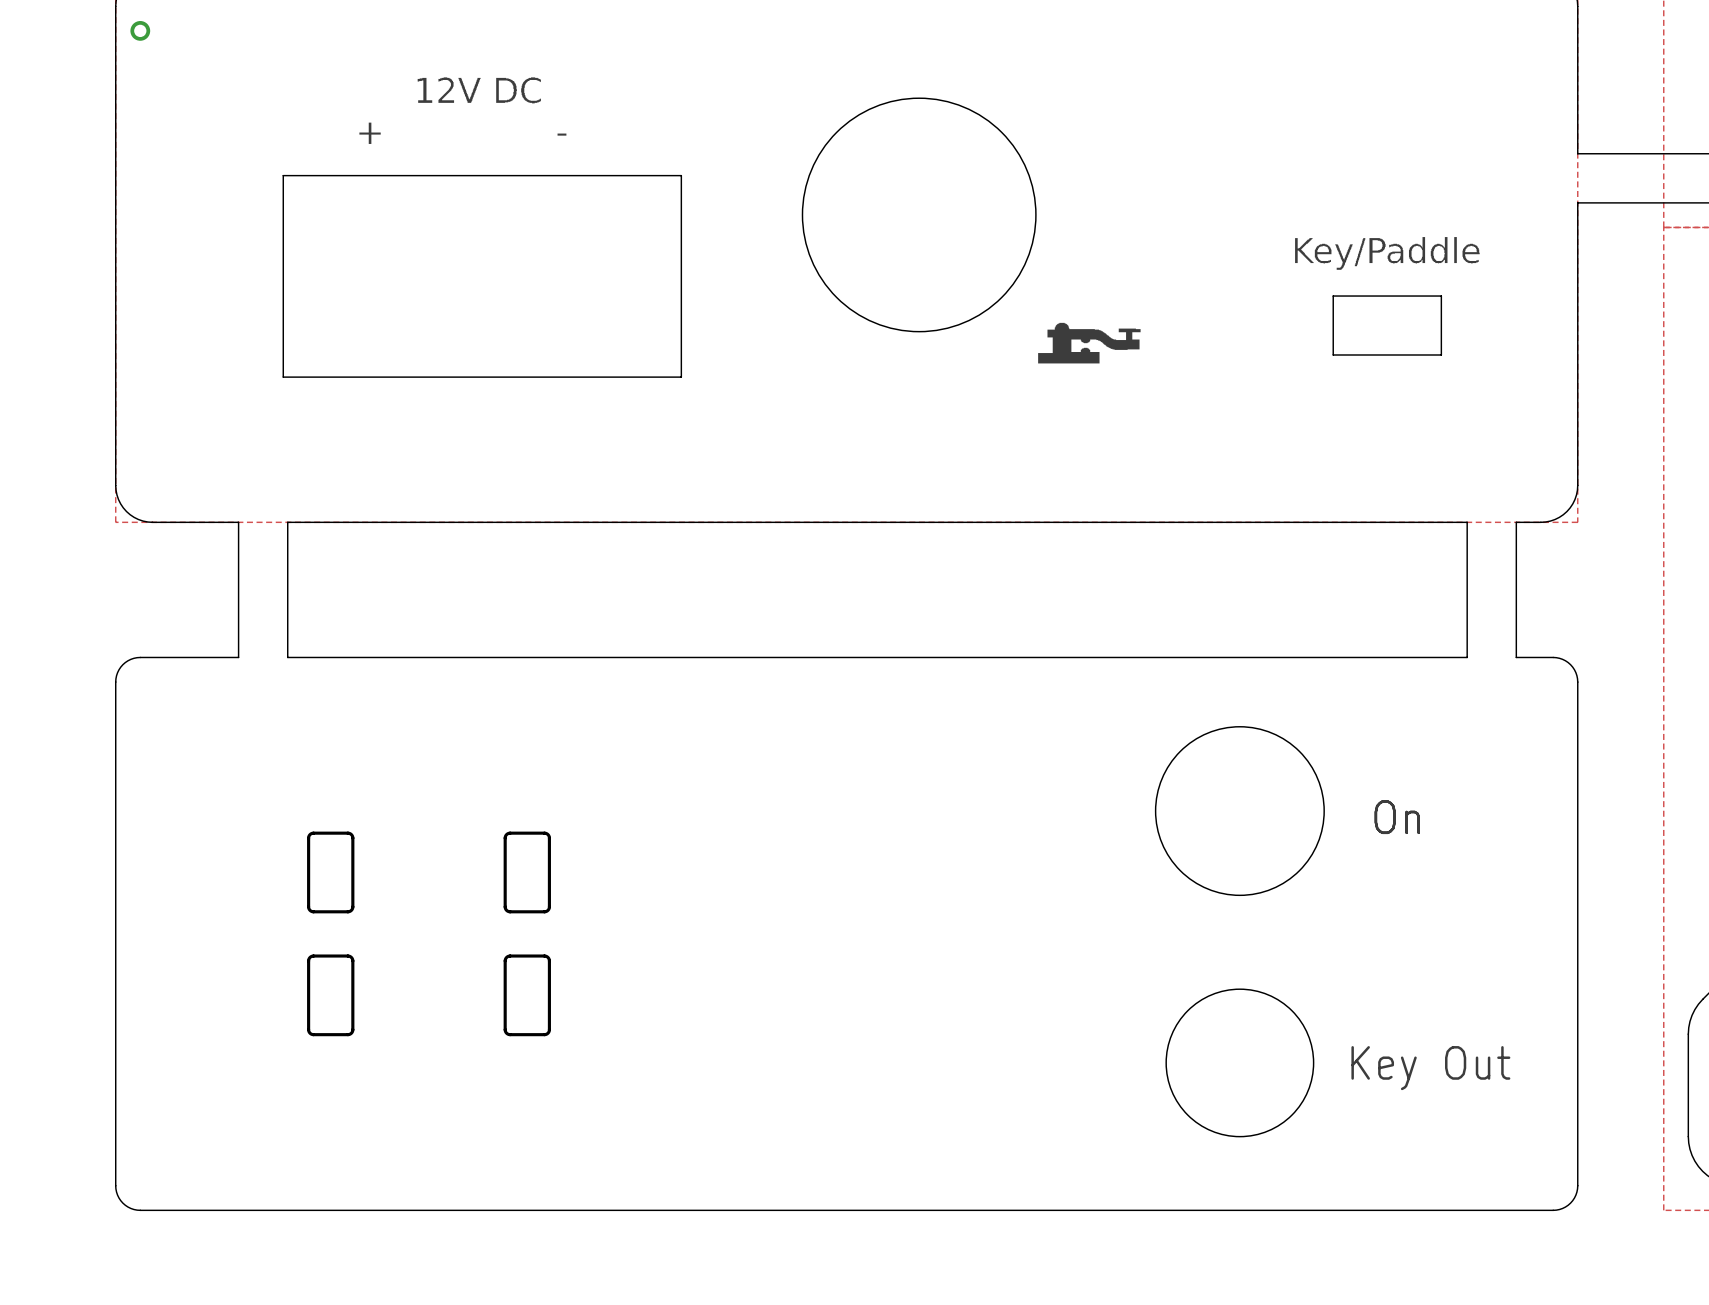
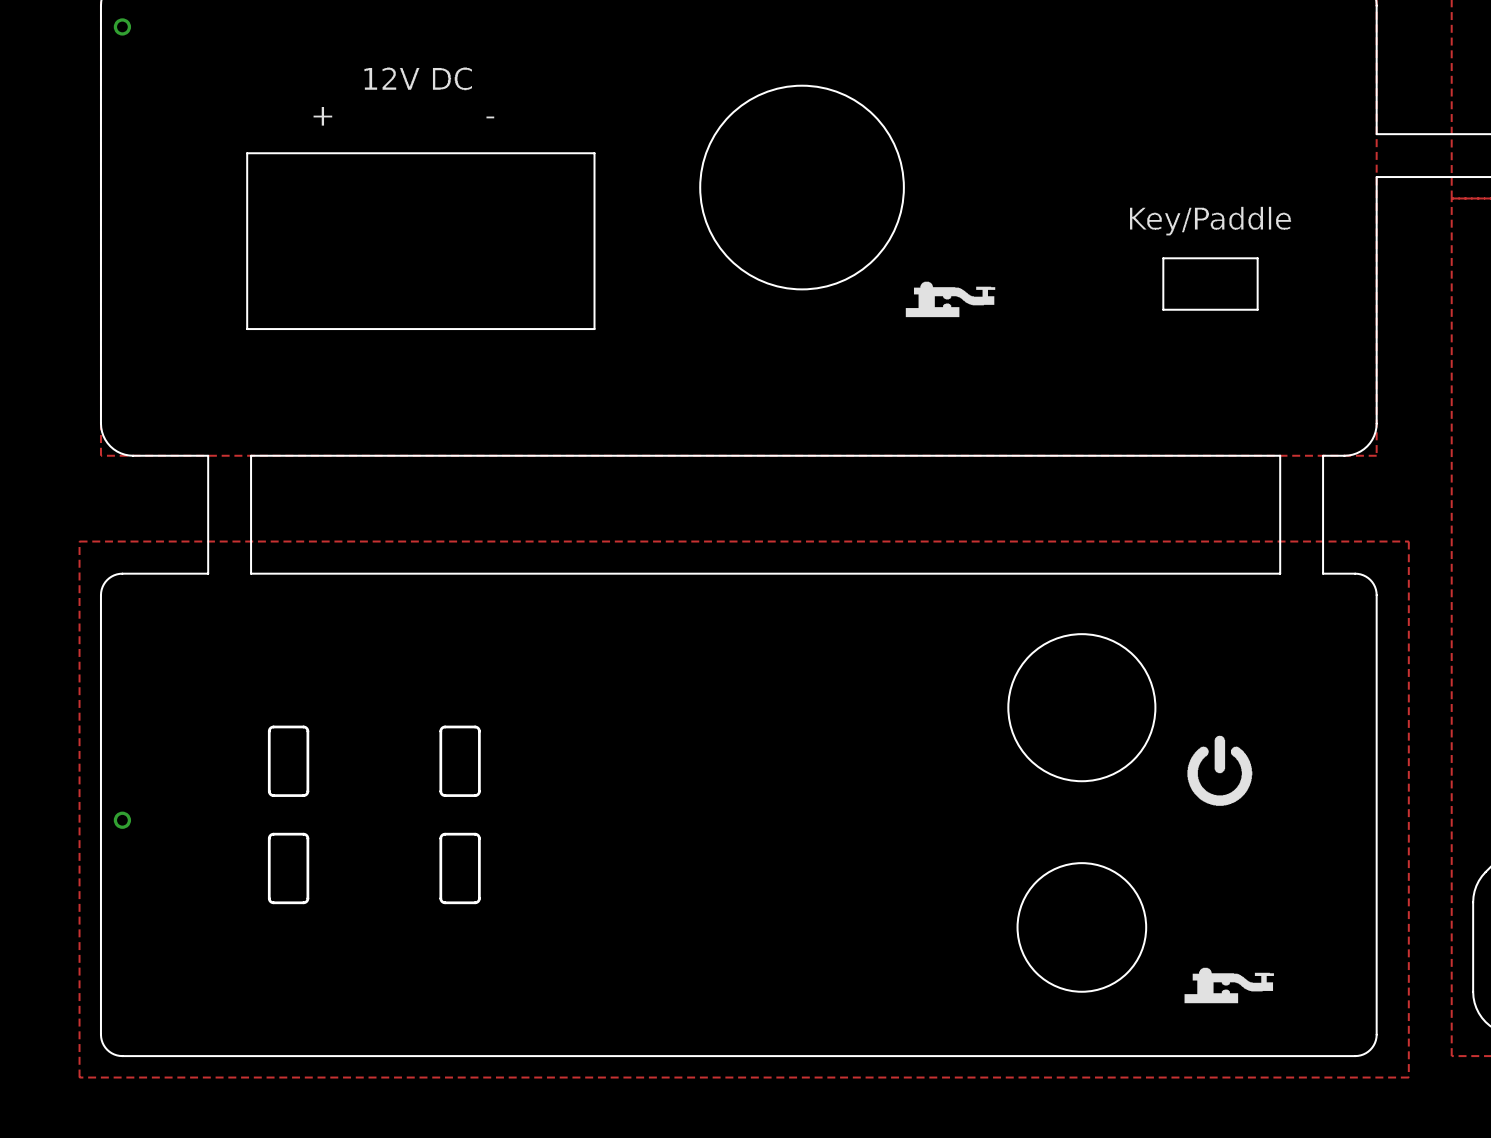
zone outline: none -> (79, 541) (1408, 541) (1408, 1077) (79, 1077) (79, 541)
text: On (1397, 817) -> none
drawing: none -> [1187, 735, 1253, 806]
via: none -> (122, 820)
text: Key Out (1430, 1068) -> none
drawing: none -> [1184, 967, 1274, 1004]

